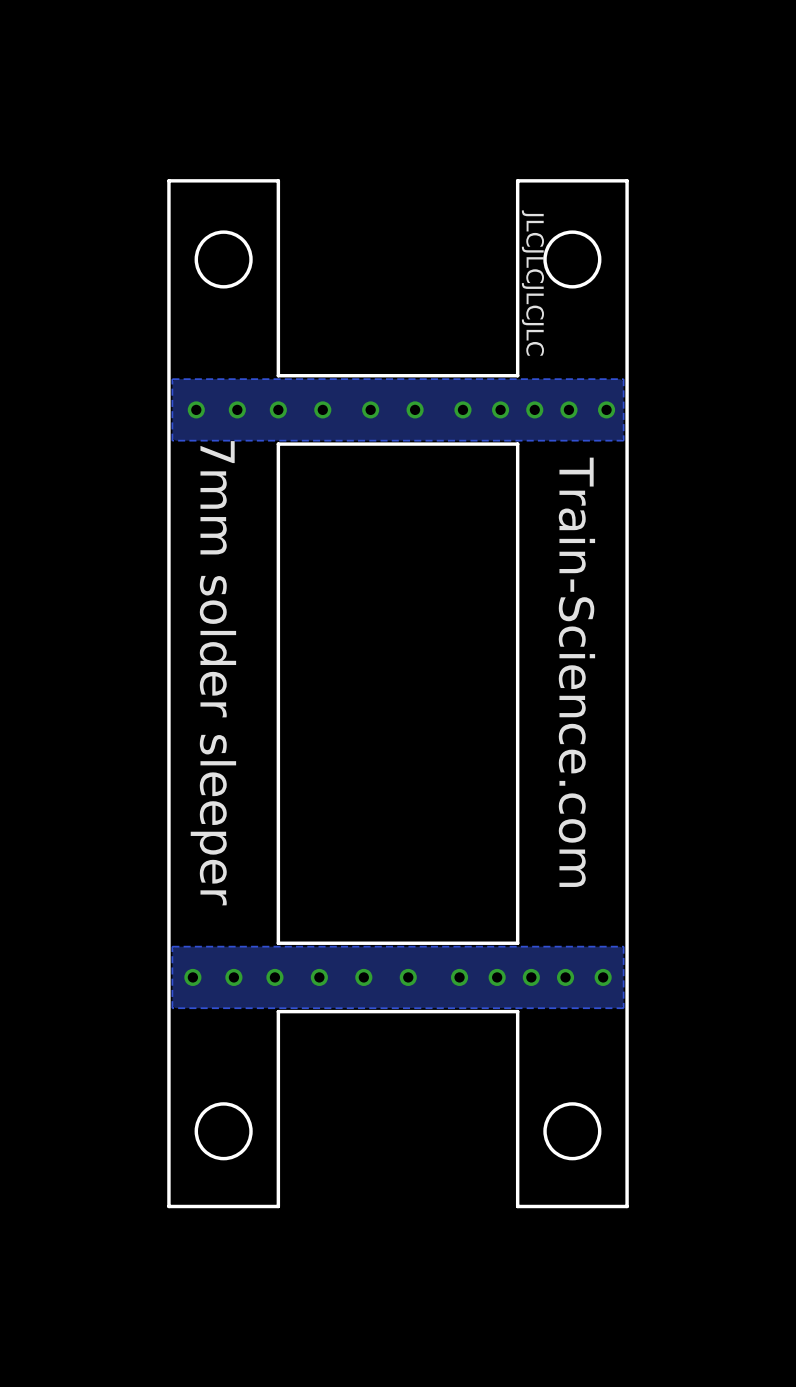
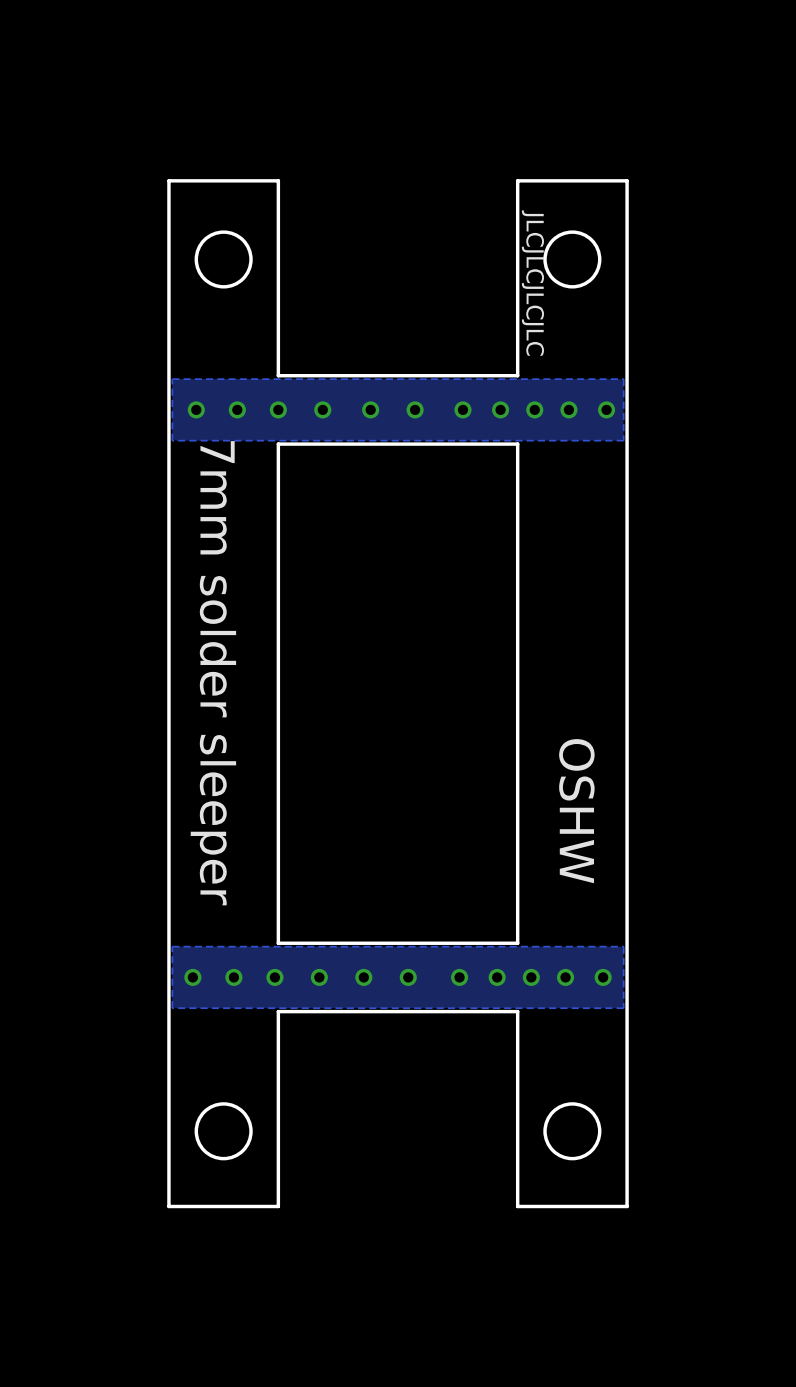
text: Train-Science.com (576, 672) -> none
text: none -> OSHW (576, 811)

